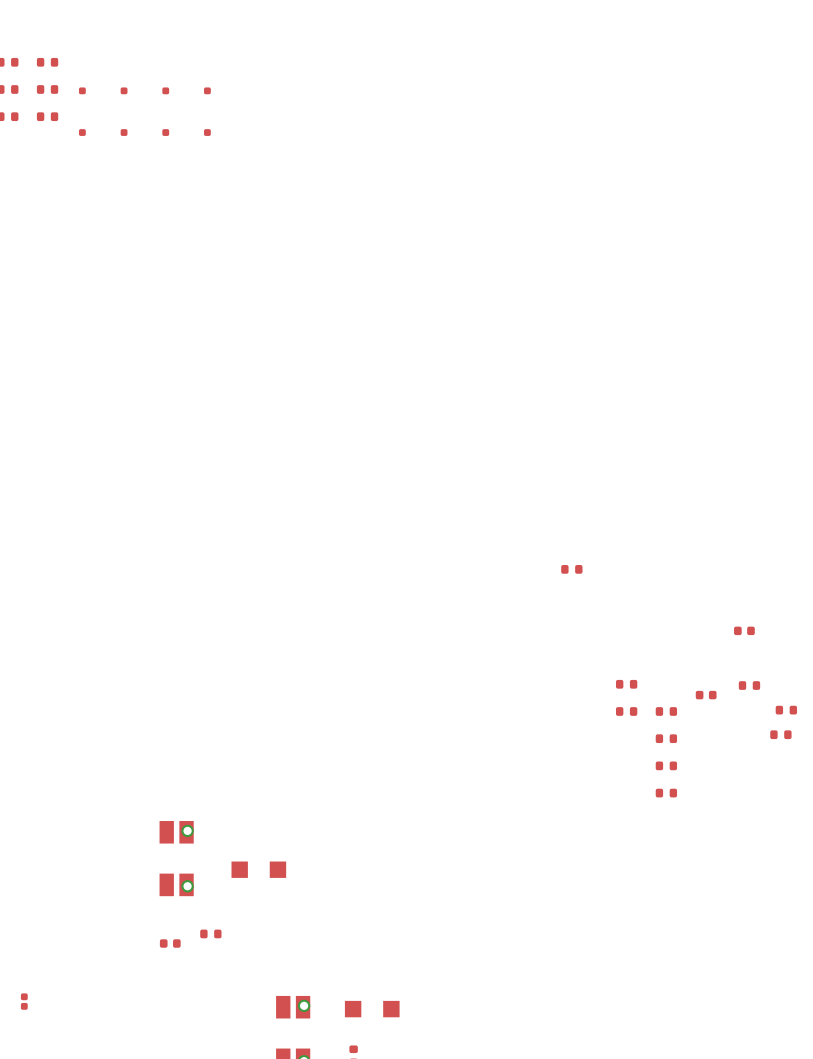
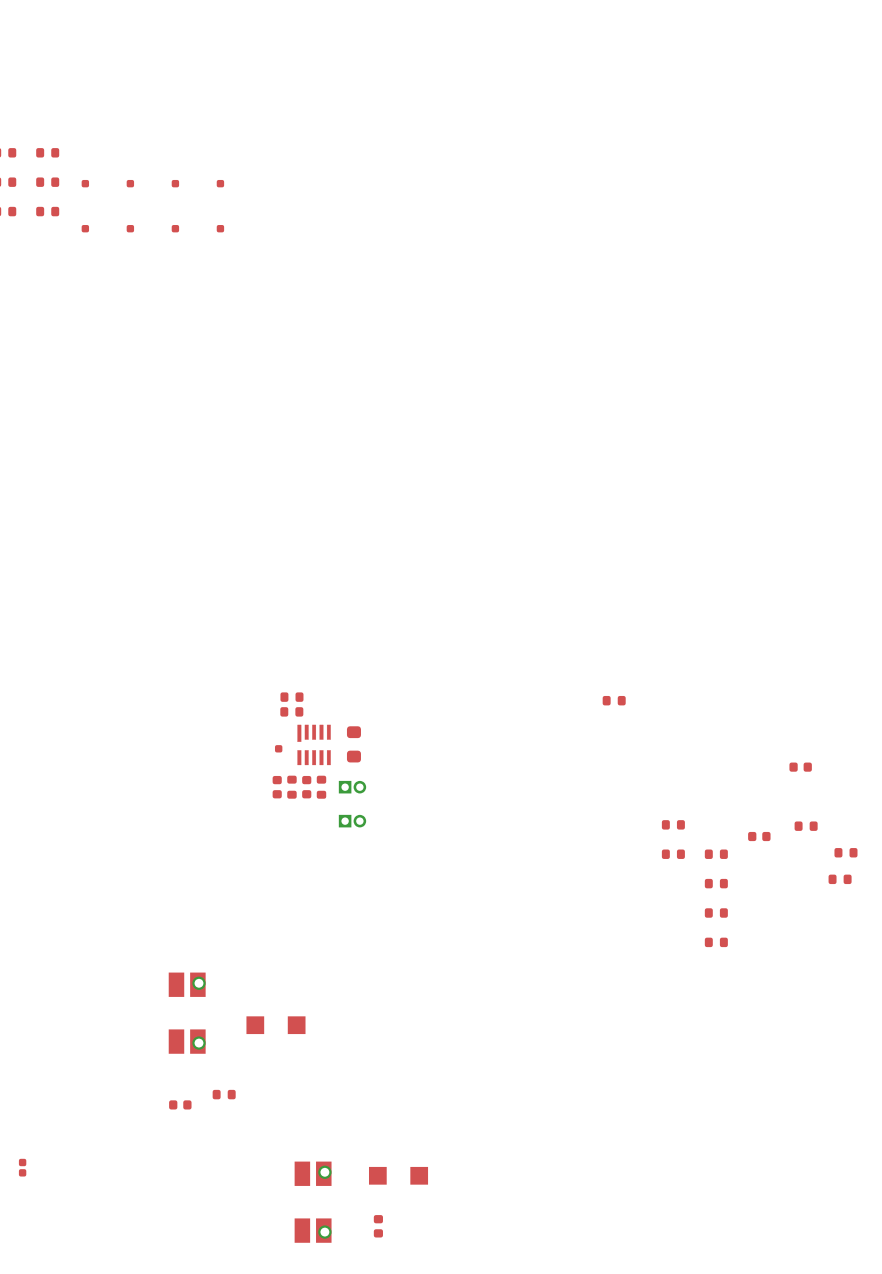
part: none -> (291, 697)
part: none -> (291, 711)
part: none -> (353, 744)
part: none -> (314, 744)
part: none -> (278, 748)
part: none -> (277, 787)
part: none -> (291, 787)
part: none -> (306, 787)
part: none -> (321, 787)
part: none -> (352, 787)
part: none -> (352, 821)

